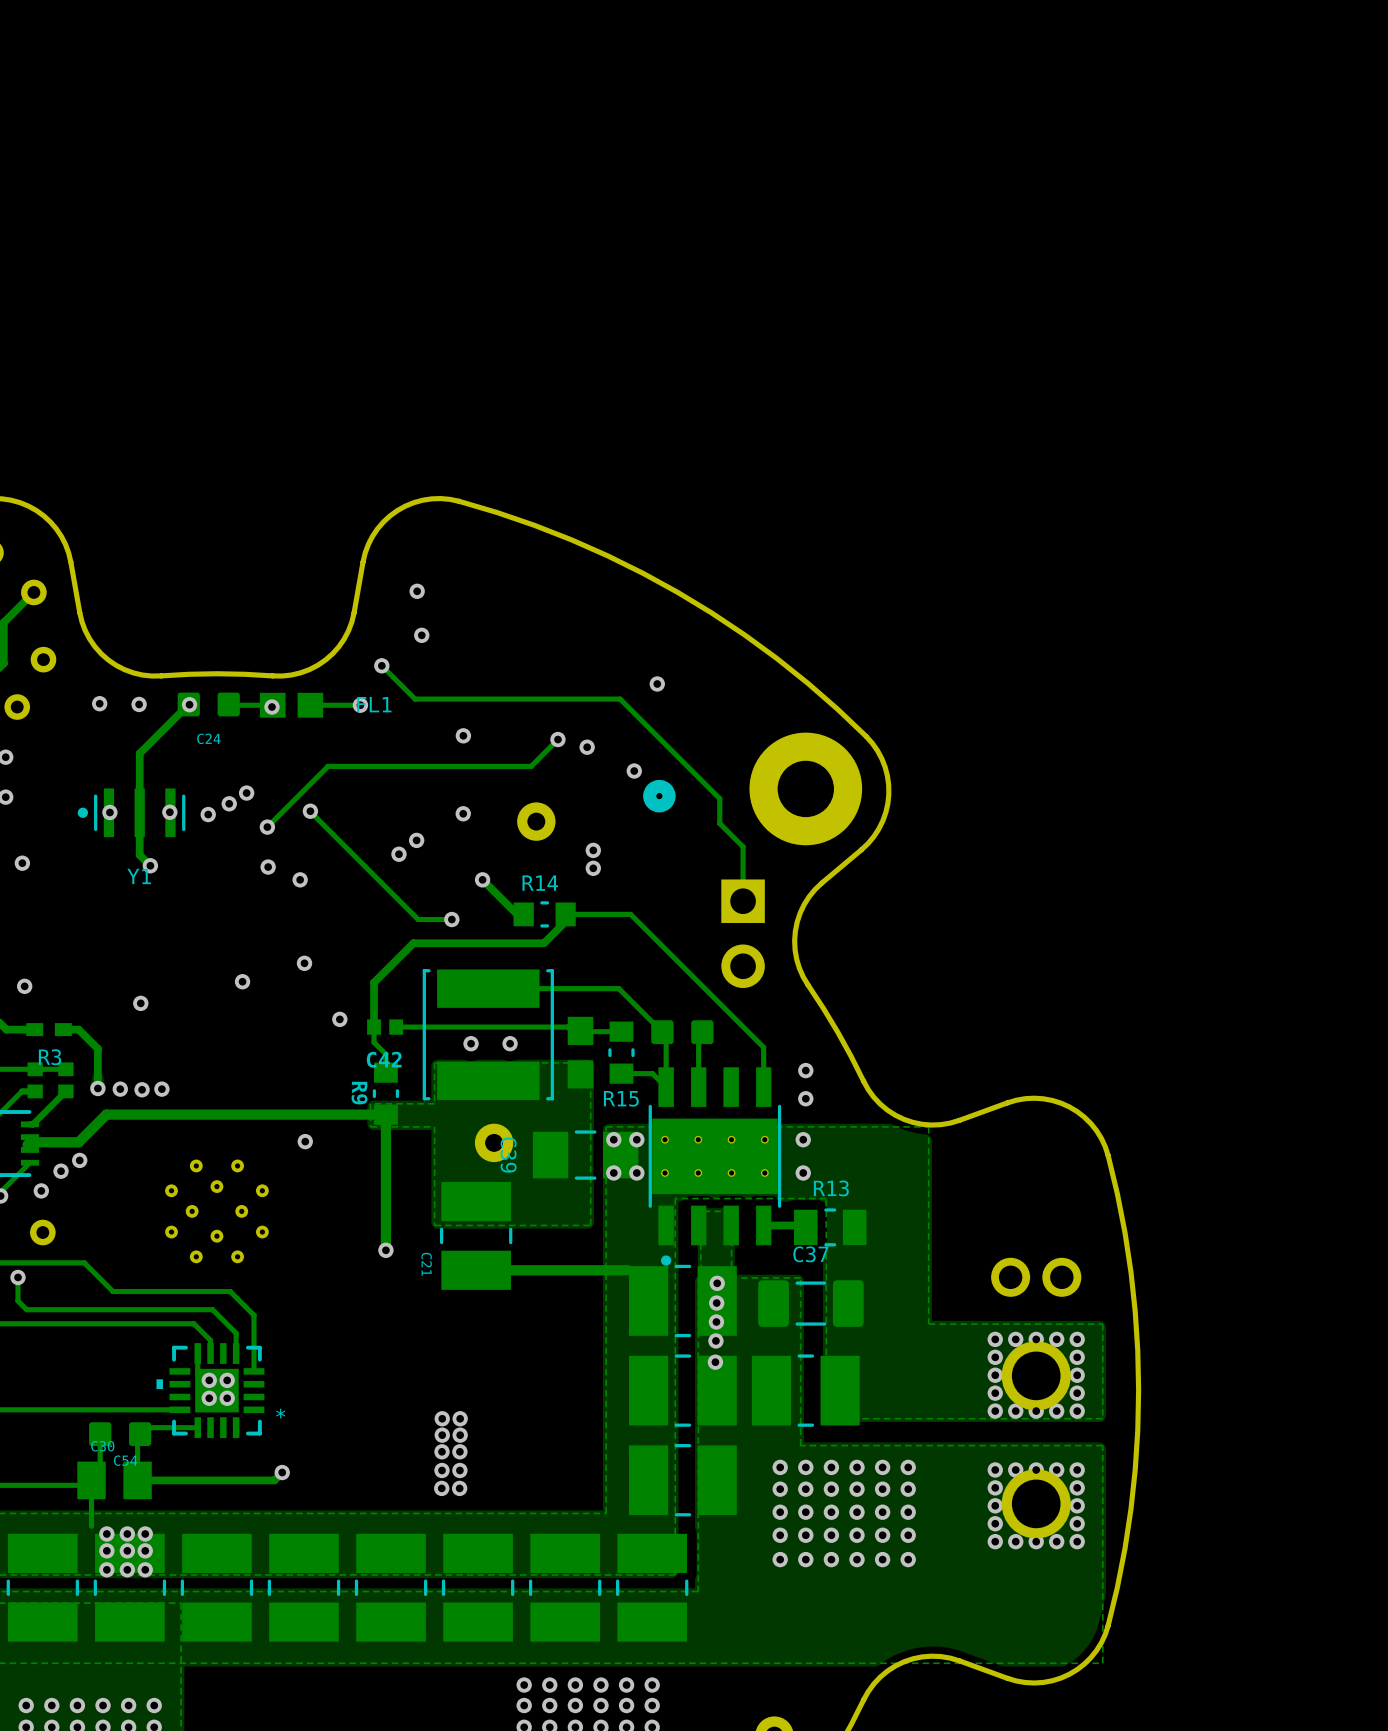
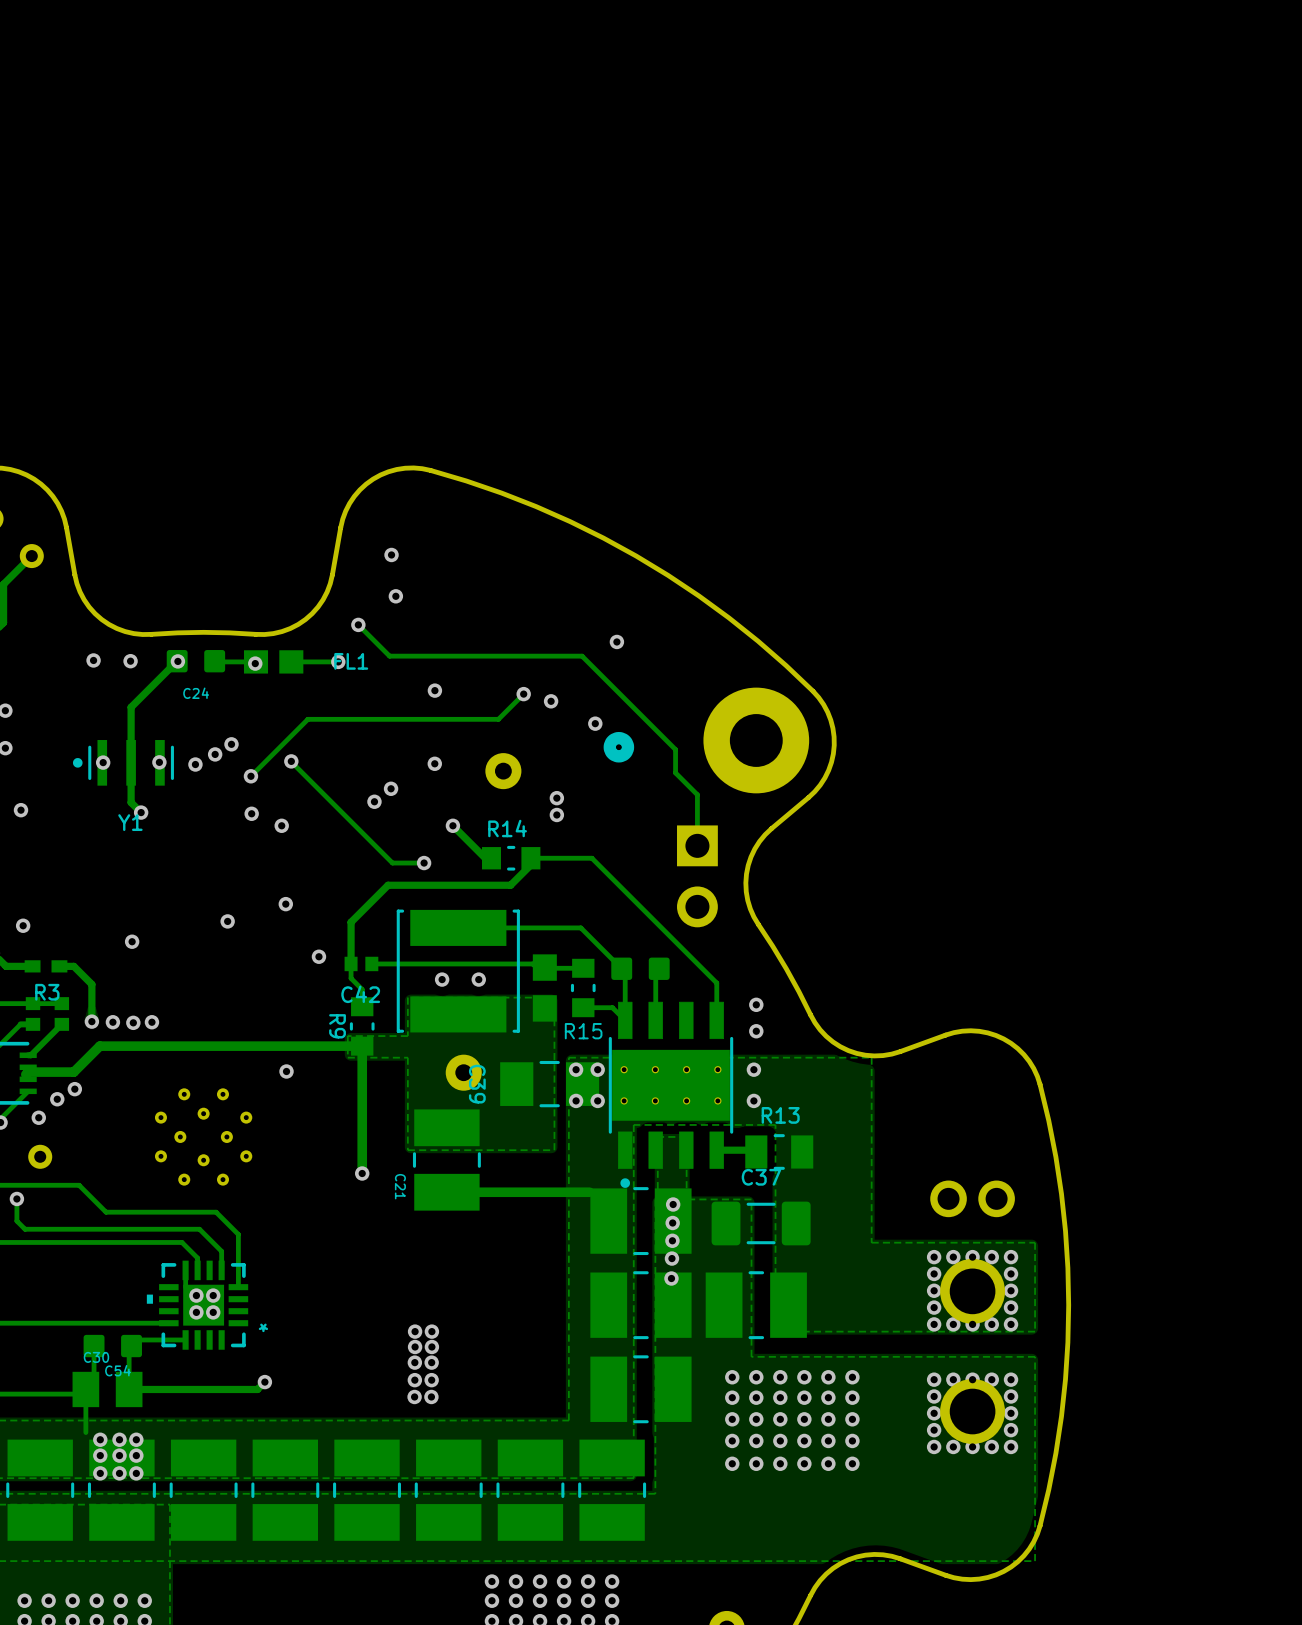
part: (43, 659) -> none
part: (17, 707) -> none

